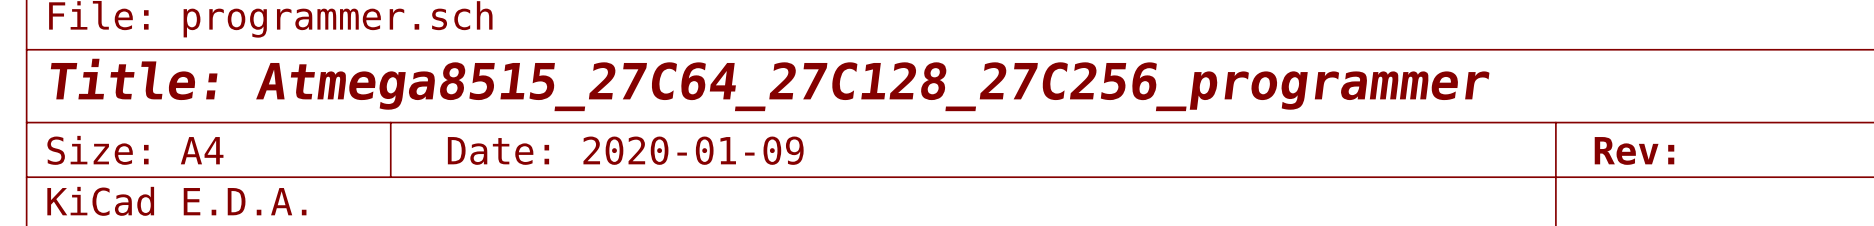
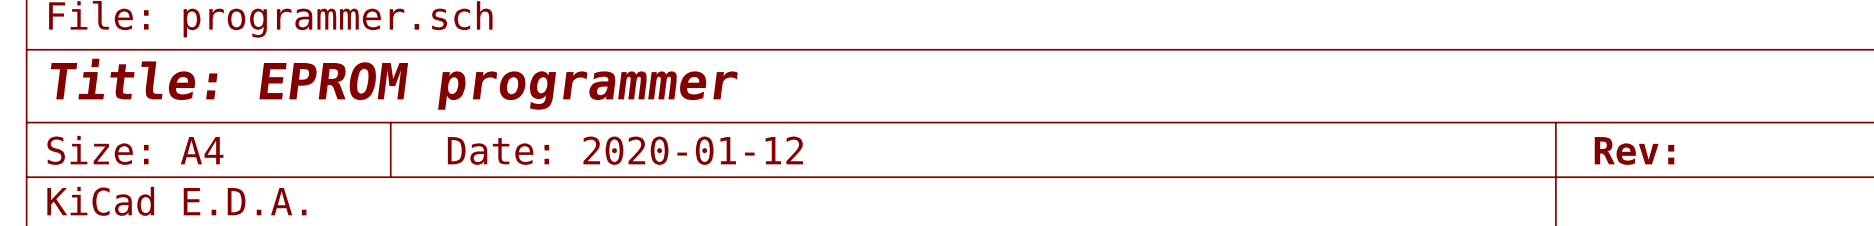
title block: Title: Atmega8515_27C64_27C128_27C256_programmer (770, 84) -> Title: EPROM programmer (394, 84)
title block: Date: 2020-01-09 (625, 150) -> Date: 2020-01-12 (625, 150)

